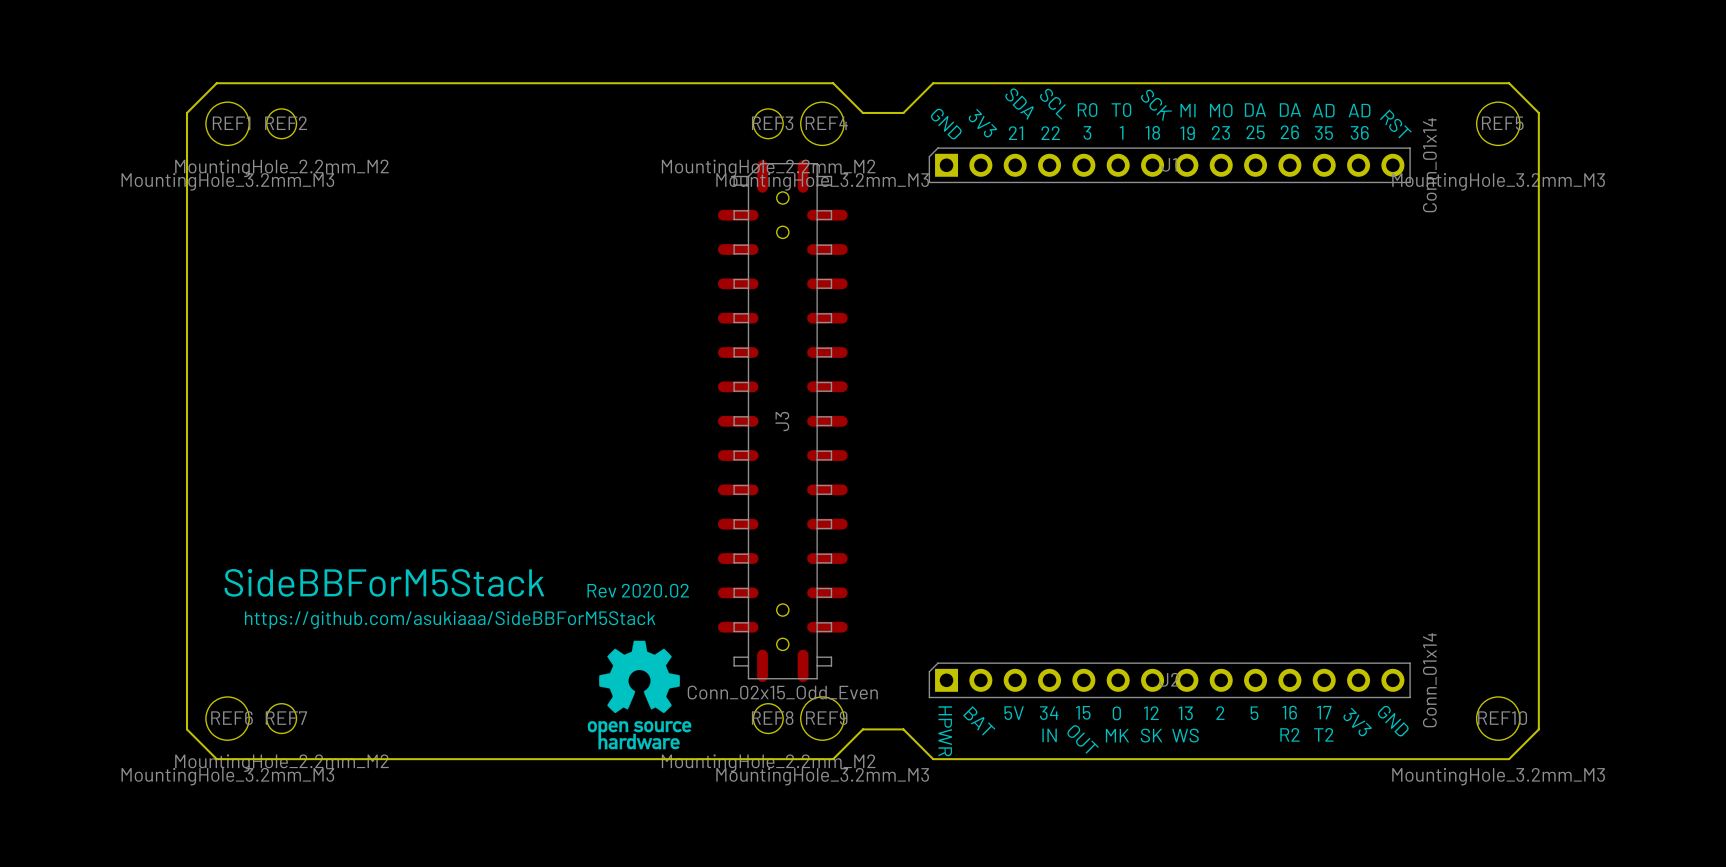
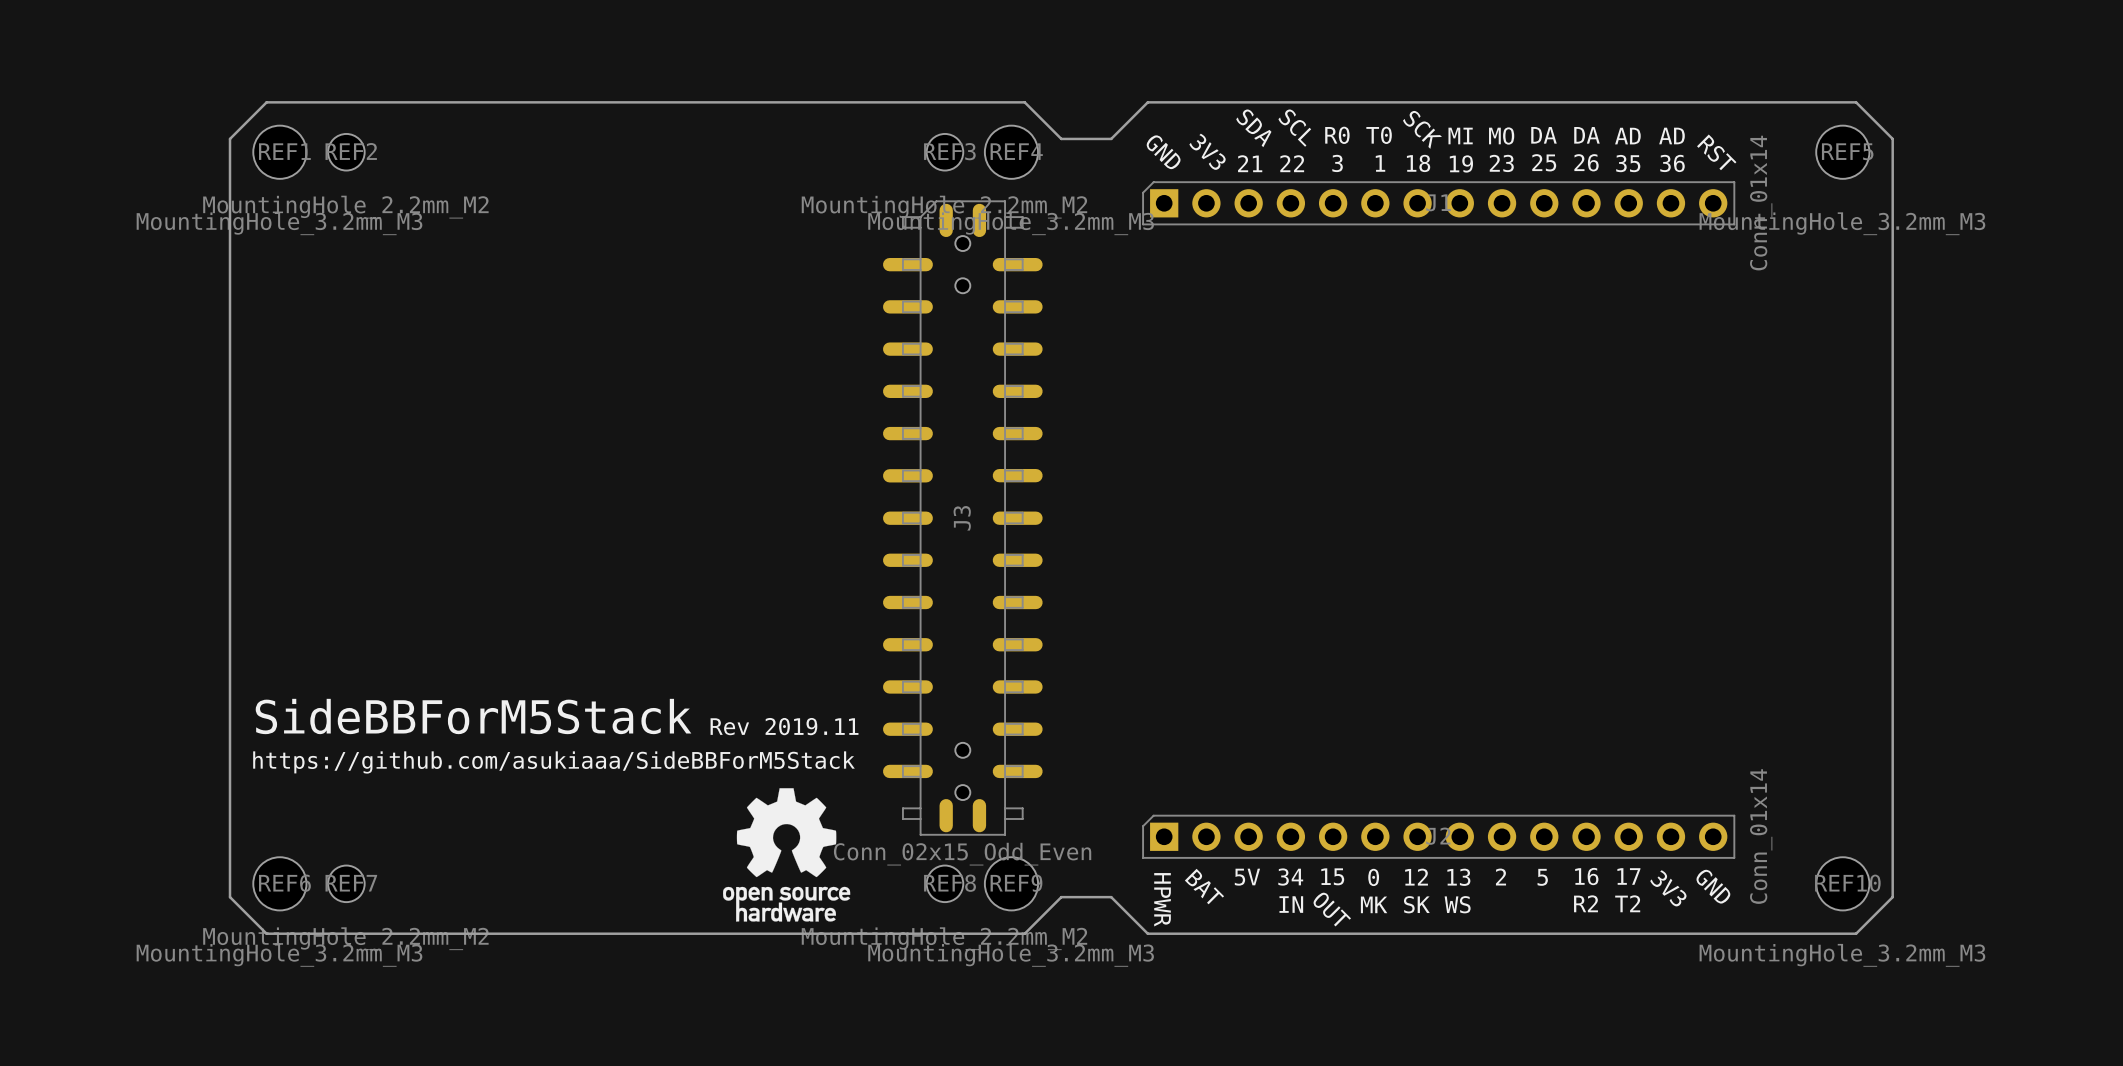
J3 footprint: [717, 160, 848, 683] -> [883, 200, 1043, 836]
text: Rev 2020.02 (638, 590) -> Rev 2019.11 (784, 726)

